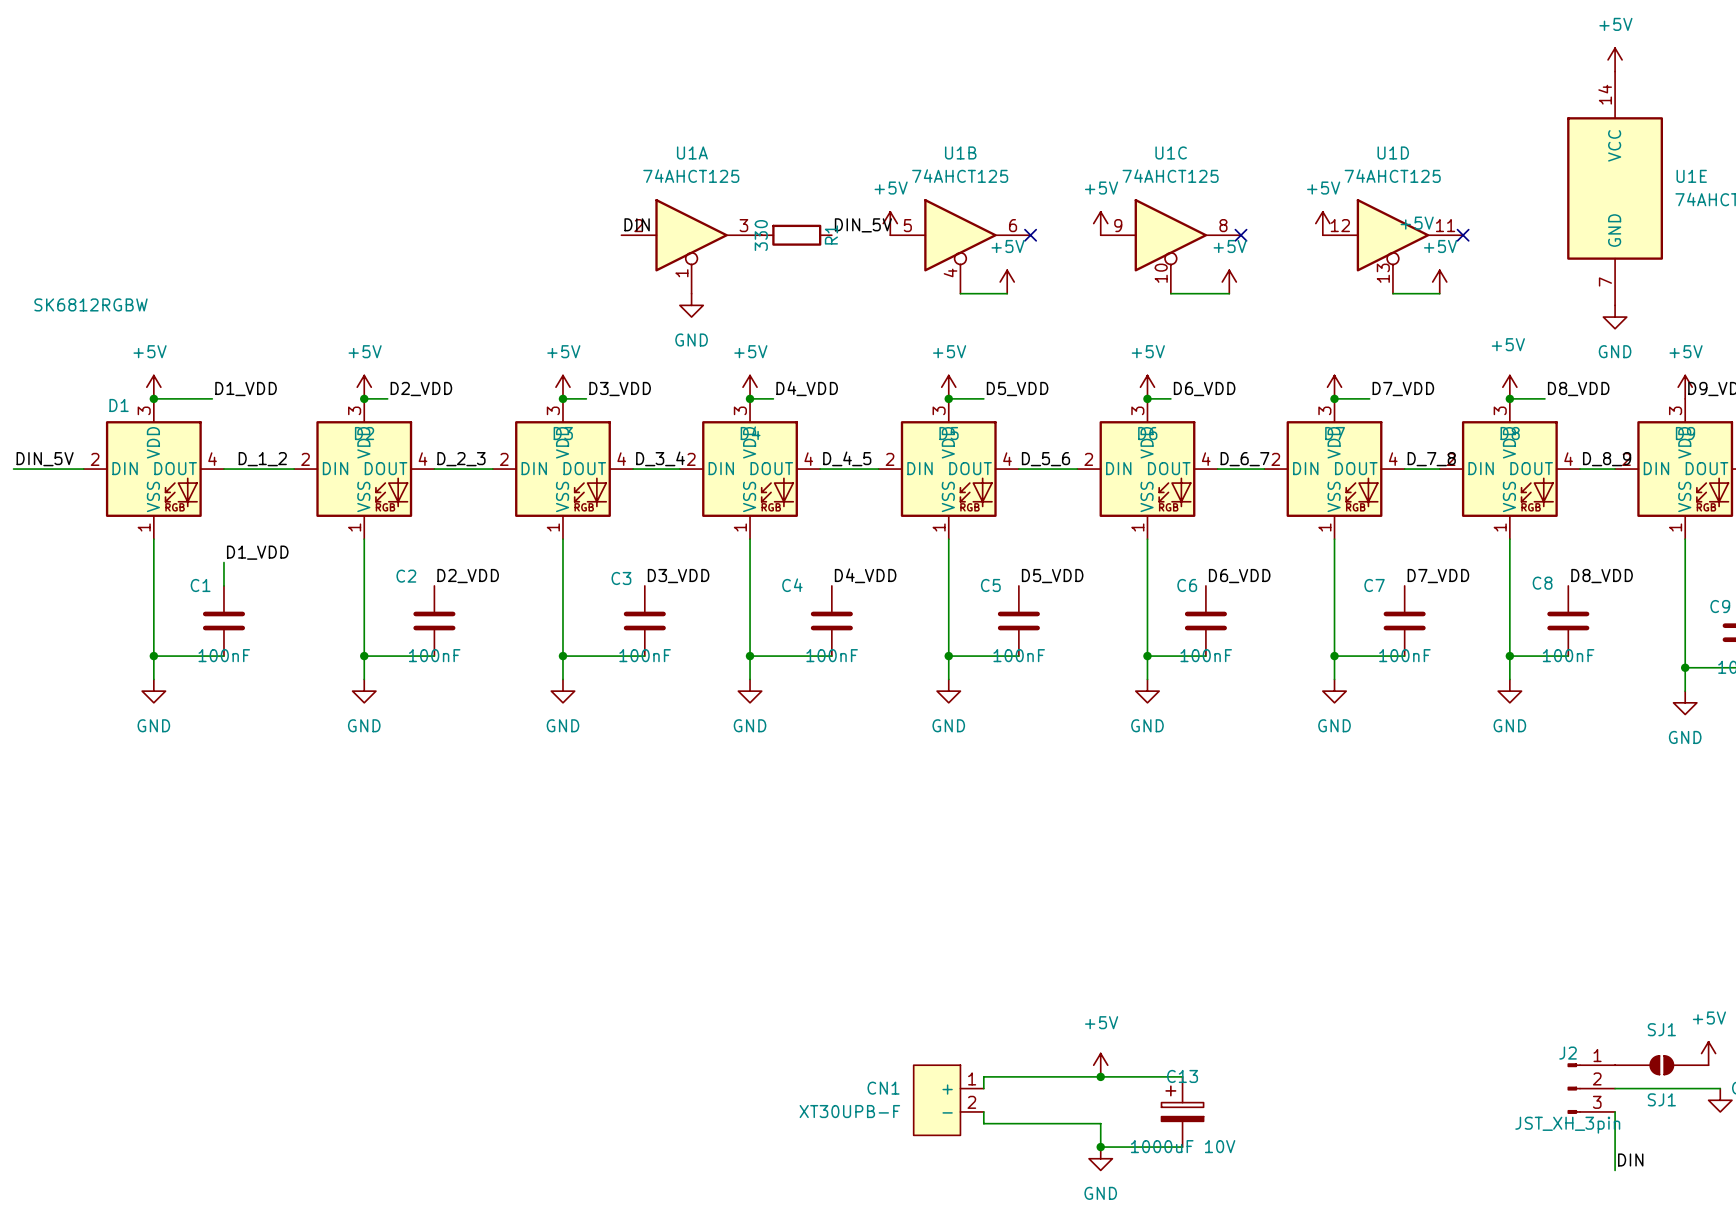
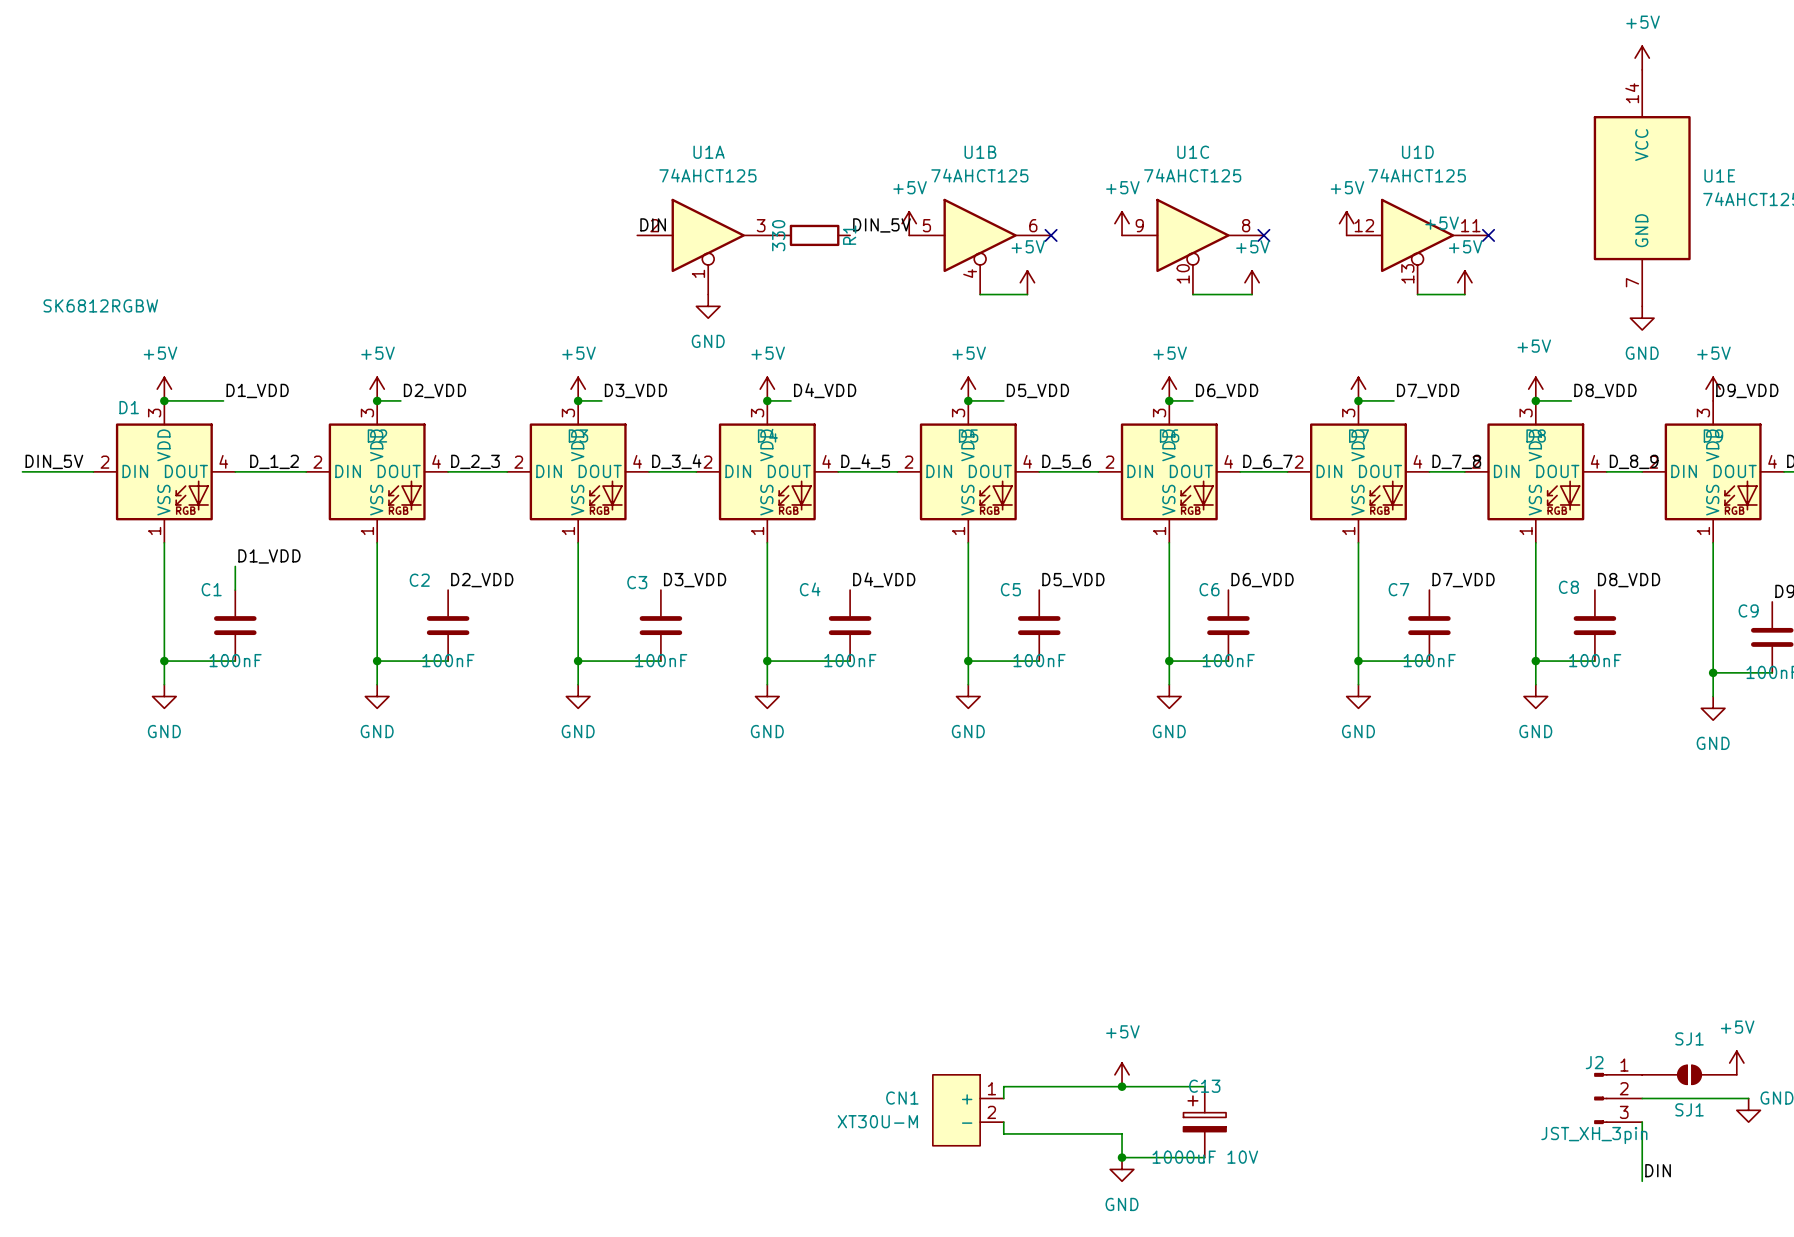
power symbol: XT30UPB-F (948, 1100) -> XT30U-M (968, 1110)

